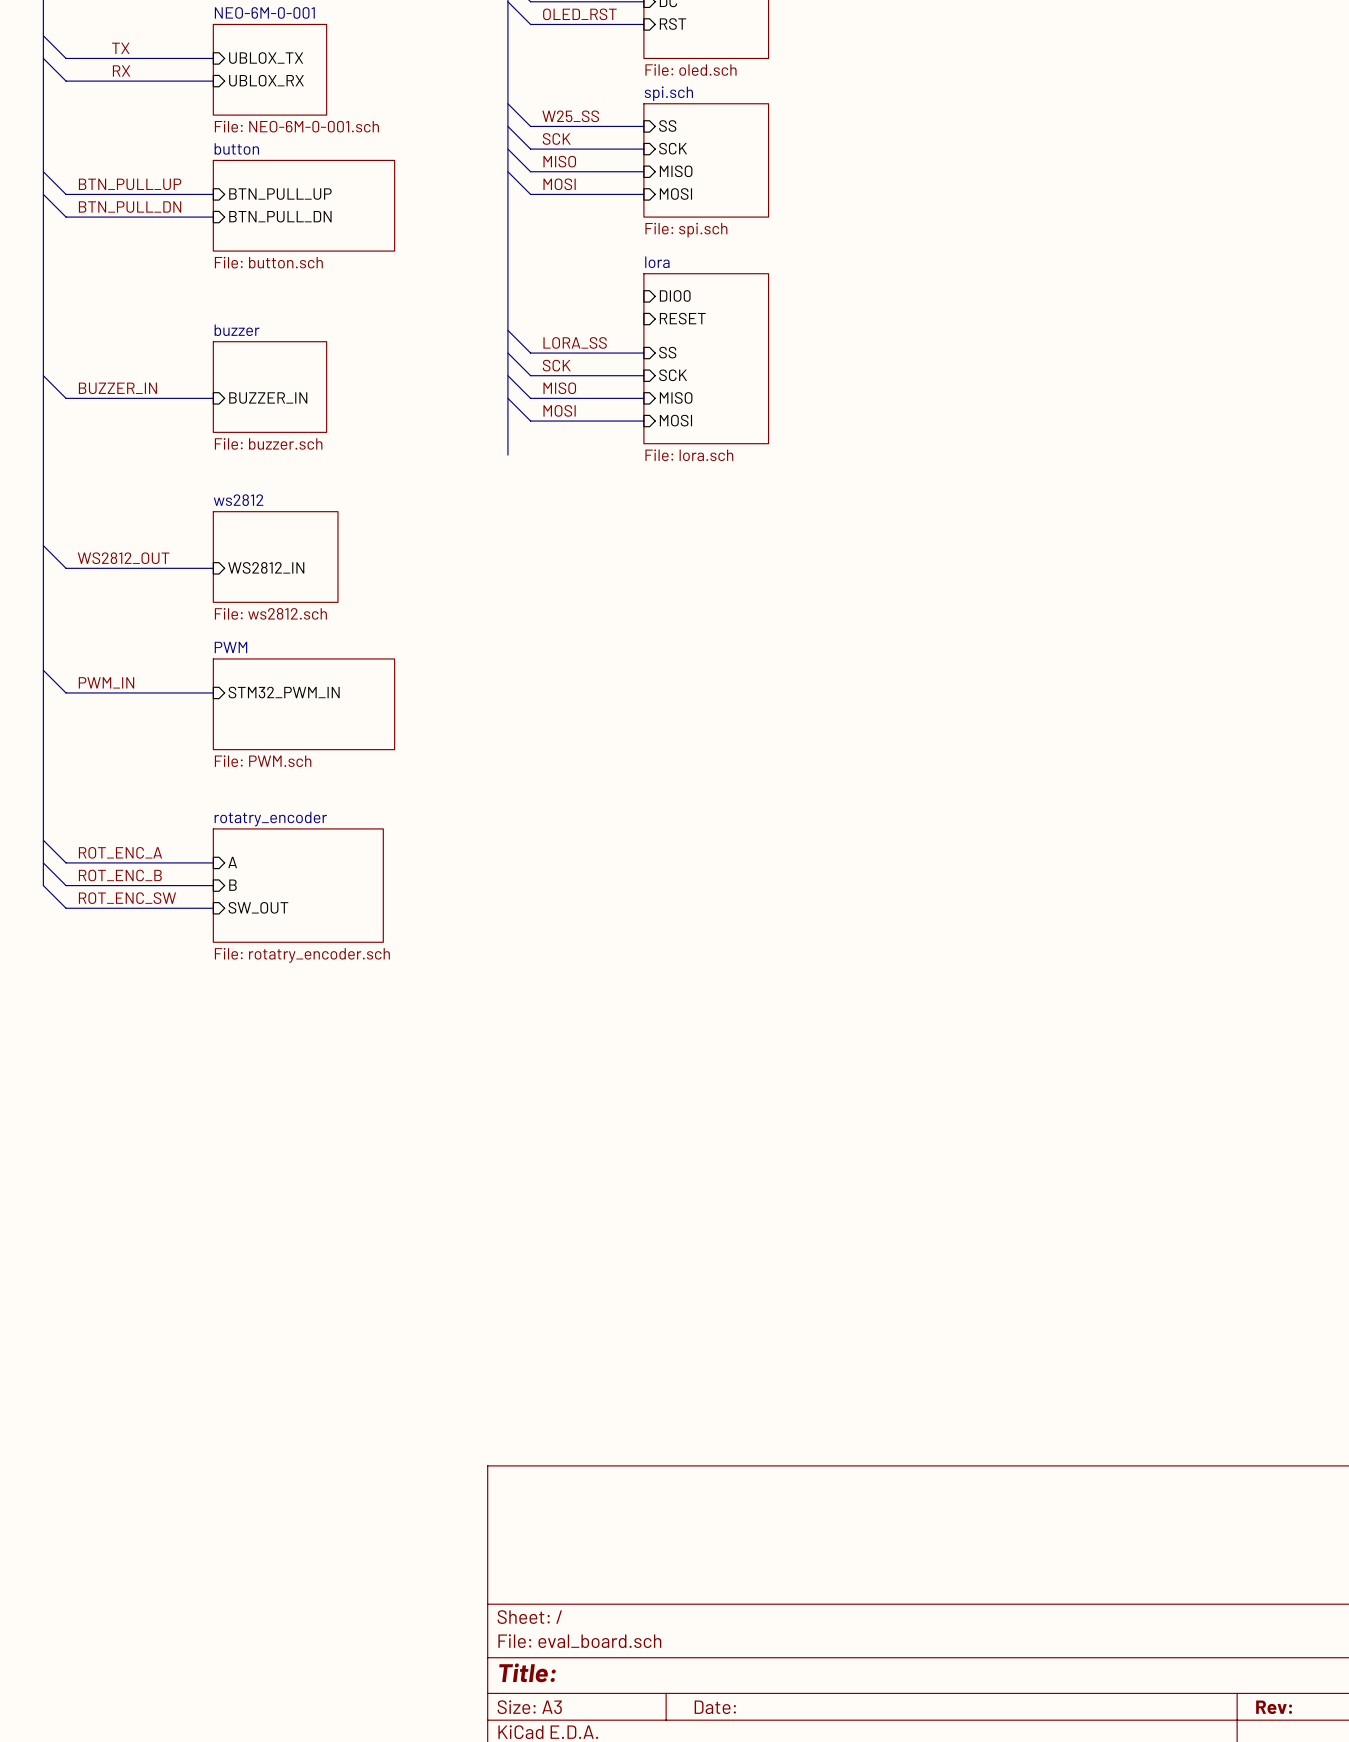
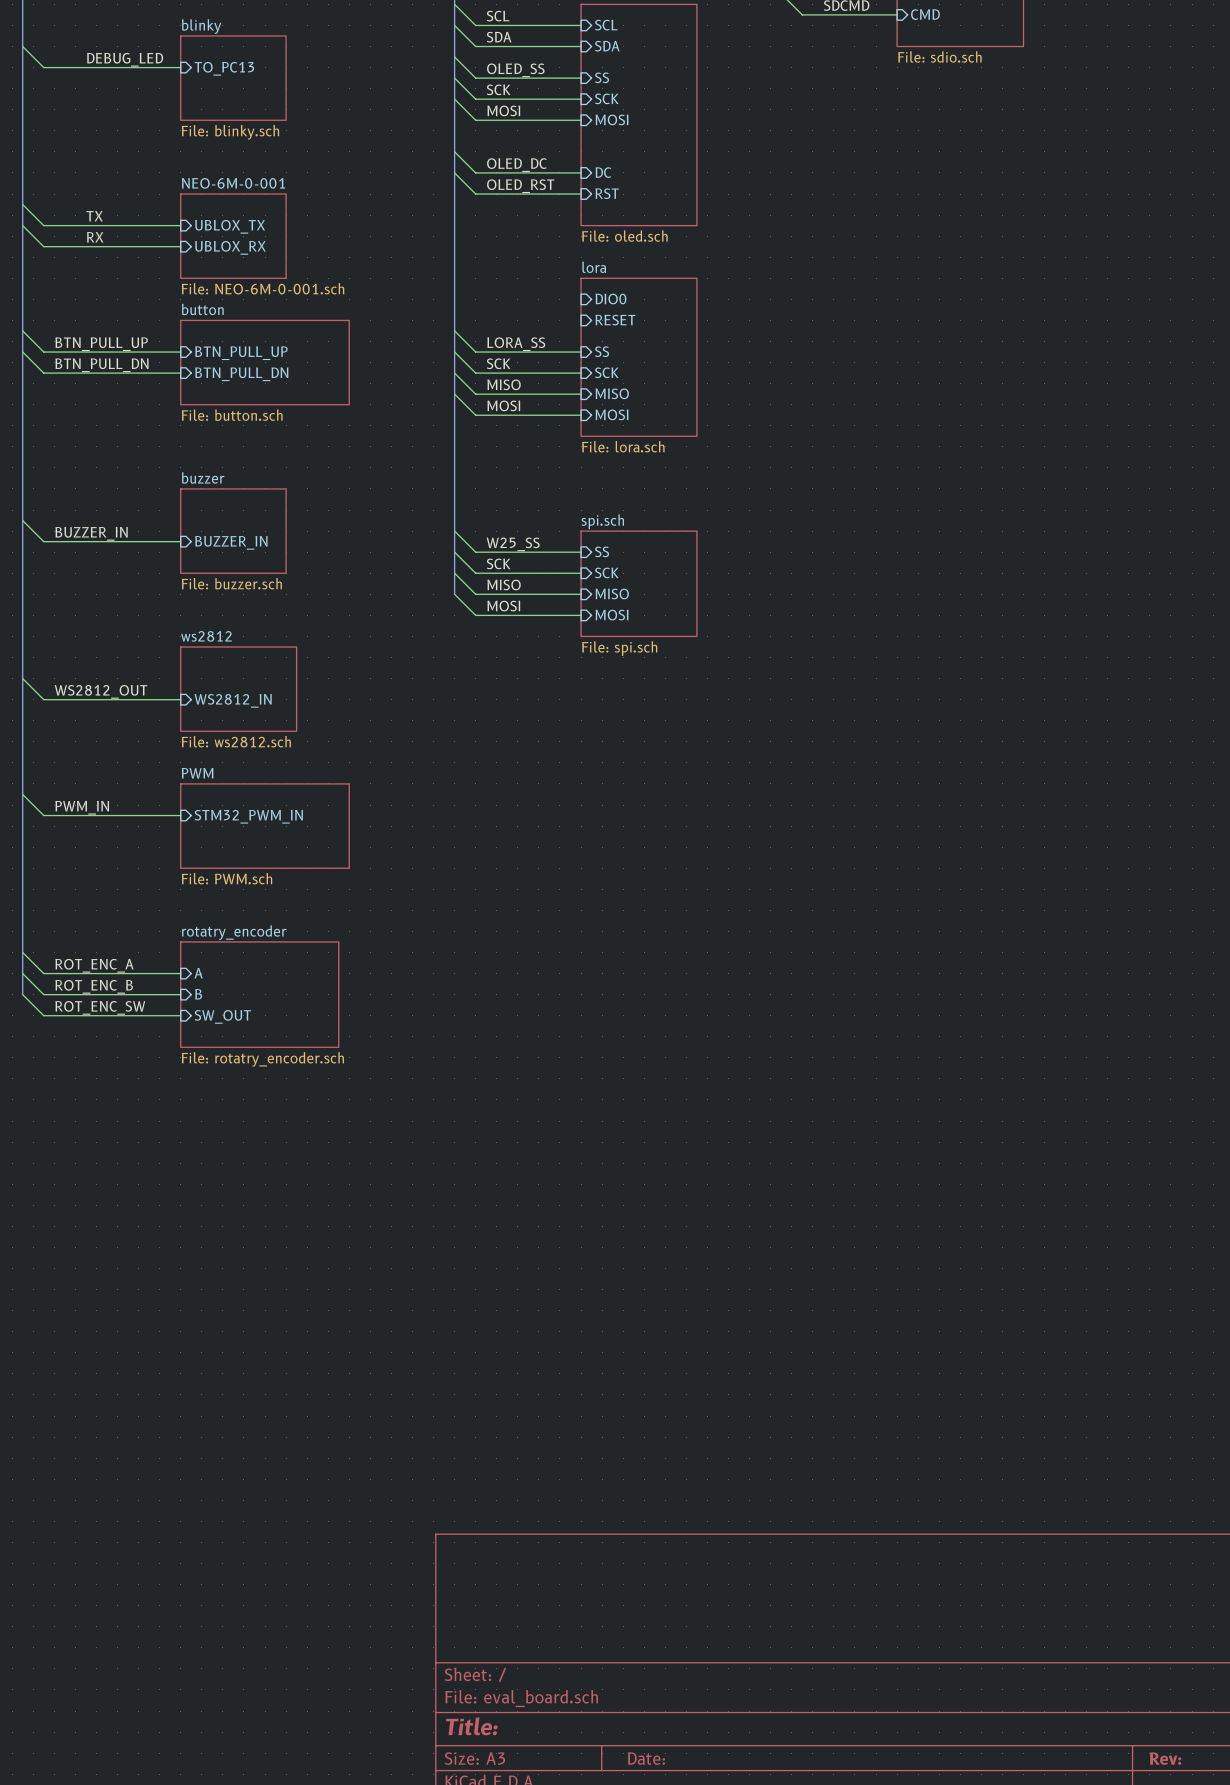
wire: (507, 103) (530, 126) (643, 126) -> (454, 352) (475, 373) (581, 373)
label: W25_SS (570, 116) -> none
wire: (507, 126) (530, 149) (643, 149) -> (454, 373) (475, 394) (581, 394)
sheet pin: SS (667, 126) -> none
label position: SCK (556, 138) -> SCK (498, 363)
sheet pin position: SCK (673, 148) -> SCK (606, 372)
wire: (507, 149) (530, 171) (643, 171) -> (454, 394) (475, 415) (581, 415)
sheet spi.sch: File: spi.sch (706, 160) -> none
label position: MISO (559, 161) -> MISO (504, 384)
sheet pin position: MISO (676, 171) -> MISO (612, 393)
label: MOSI (559, 184) -> LORA_SS (516, 344)
sheet pin: MOSI (675, 193) -> SS (602, 351)
label: none -> MOSI (503, 405)
sheet pin: none -> MOSI (611, 414)
sheet pin position: DIO0 (675, 295) -> DIO0 (610, 299)
sheet pin position: RESET (682, 318) -> RESET (615, 320)
wire: (507, 330) (530, 353) (643, 353) -> (454, 531) (475, 552) (581, 552)
label: LORA_SS (575, 342) -> none
sheet pin position: SS (667, 352) -> SS (602, 551)
wire: (507, 353) (530, 375) (643, 375) -> (454, 552) (475, 573) (581, 573)
sheet lora position: (706, 358) -> (638, 357)
label position: SCK (556, 365) -> SCK (498, 563)
wire: (507, 375) (530, 398) (643, 398) -> (454, 573) (475, 594) (581, 594)
sheet pin position: SCK (673, 375) -> SCK (606, 572)
label position: MISO (559, 388) -> MISO (504, 584)
sheet pin position: MISO (676, 397) -> MISO (612, 593)
wire: (507, 398) (530, 421) (643, 421) -> (454, 594) (475, 615) (581, 615)
label: none -> W25_SS (513, 544)
label position: MOSI (559, 410) -> MOSI (503, 606)
sheet pin position: MOSI (675, 420) -> MOSI (611, 615)
sheet spi.sch: none -> File: spi.sch (638, 583)

